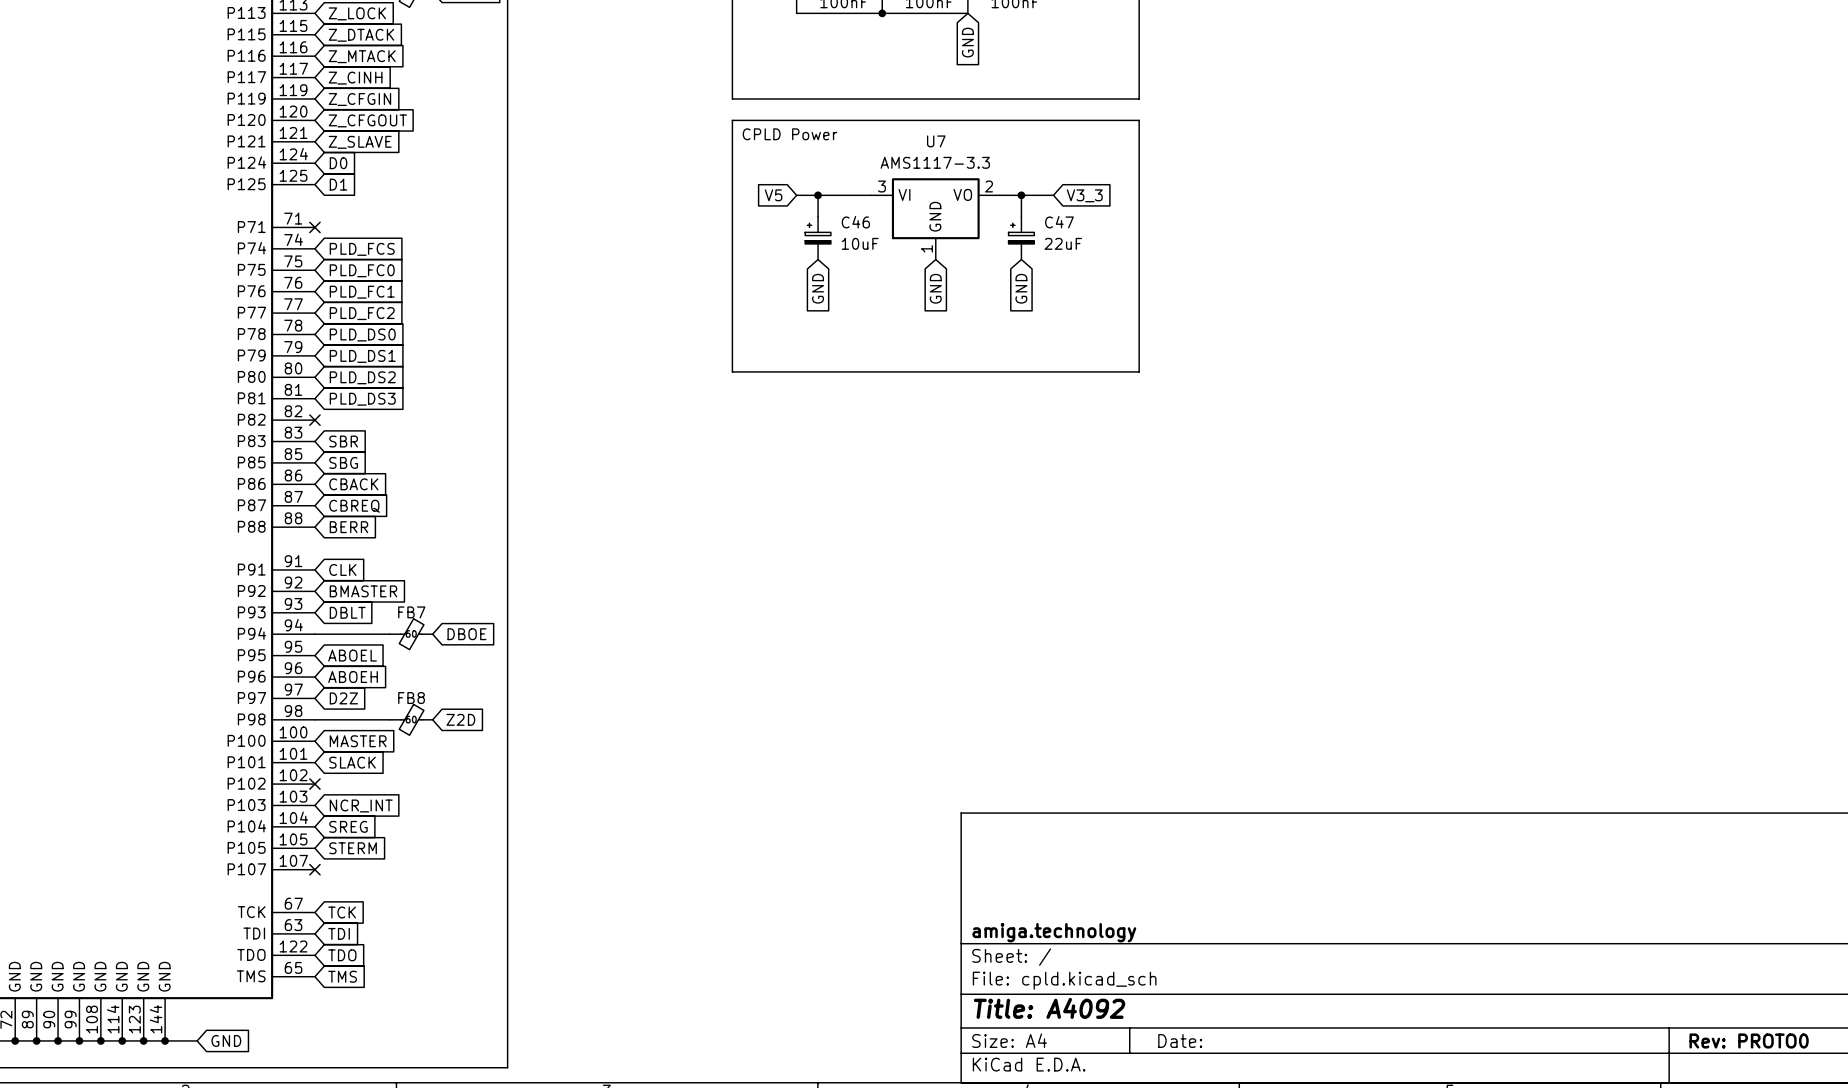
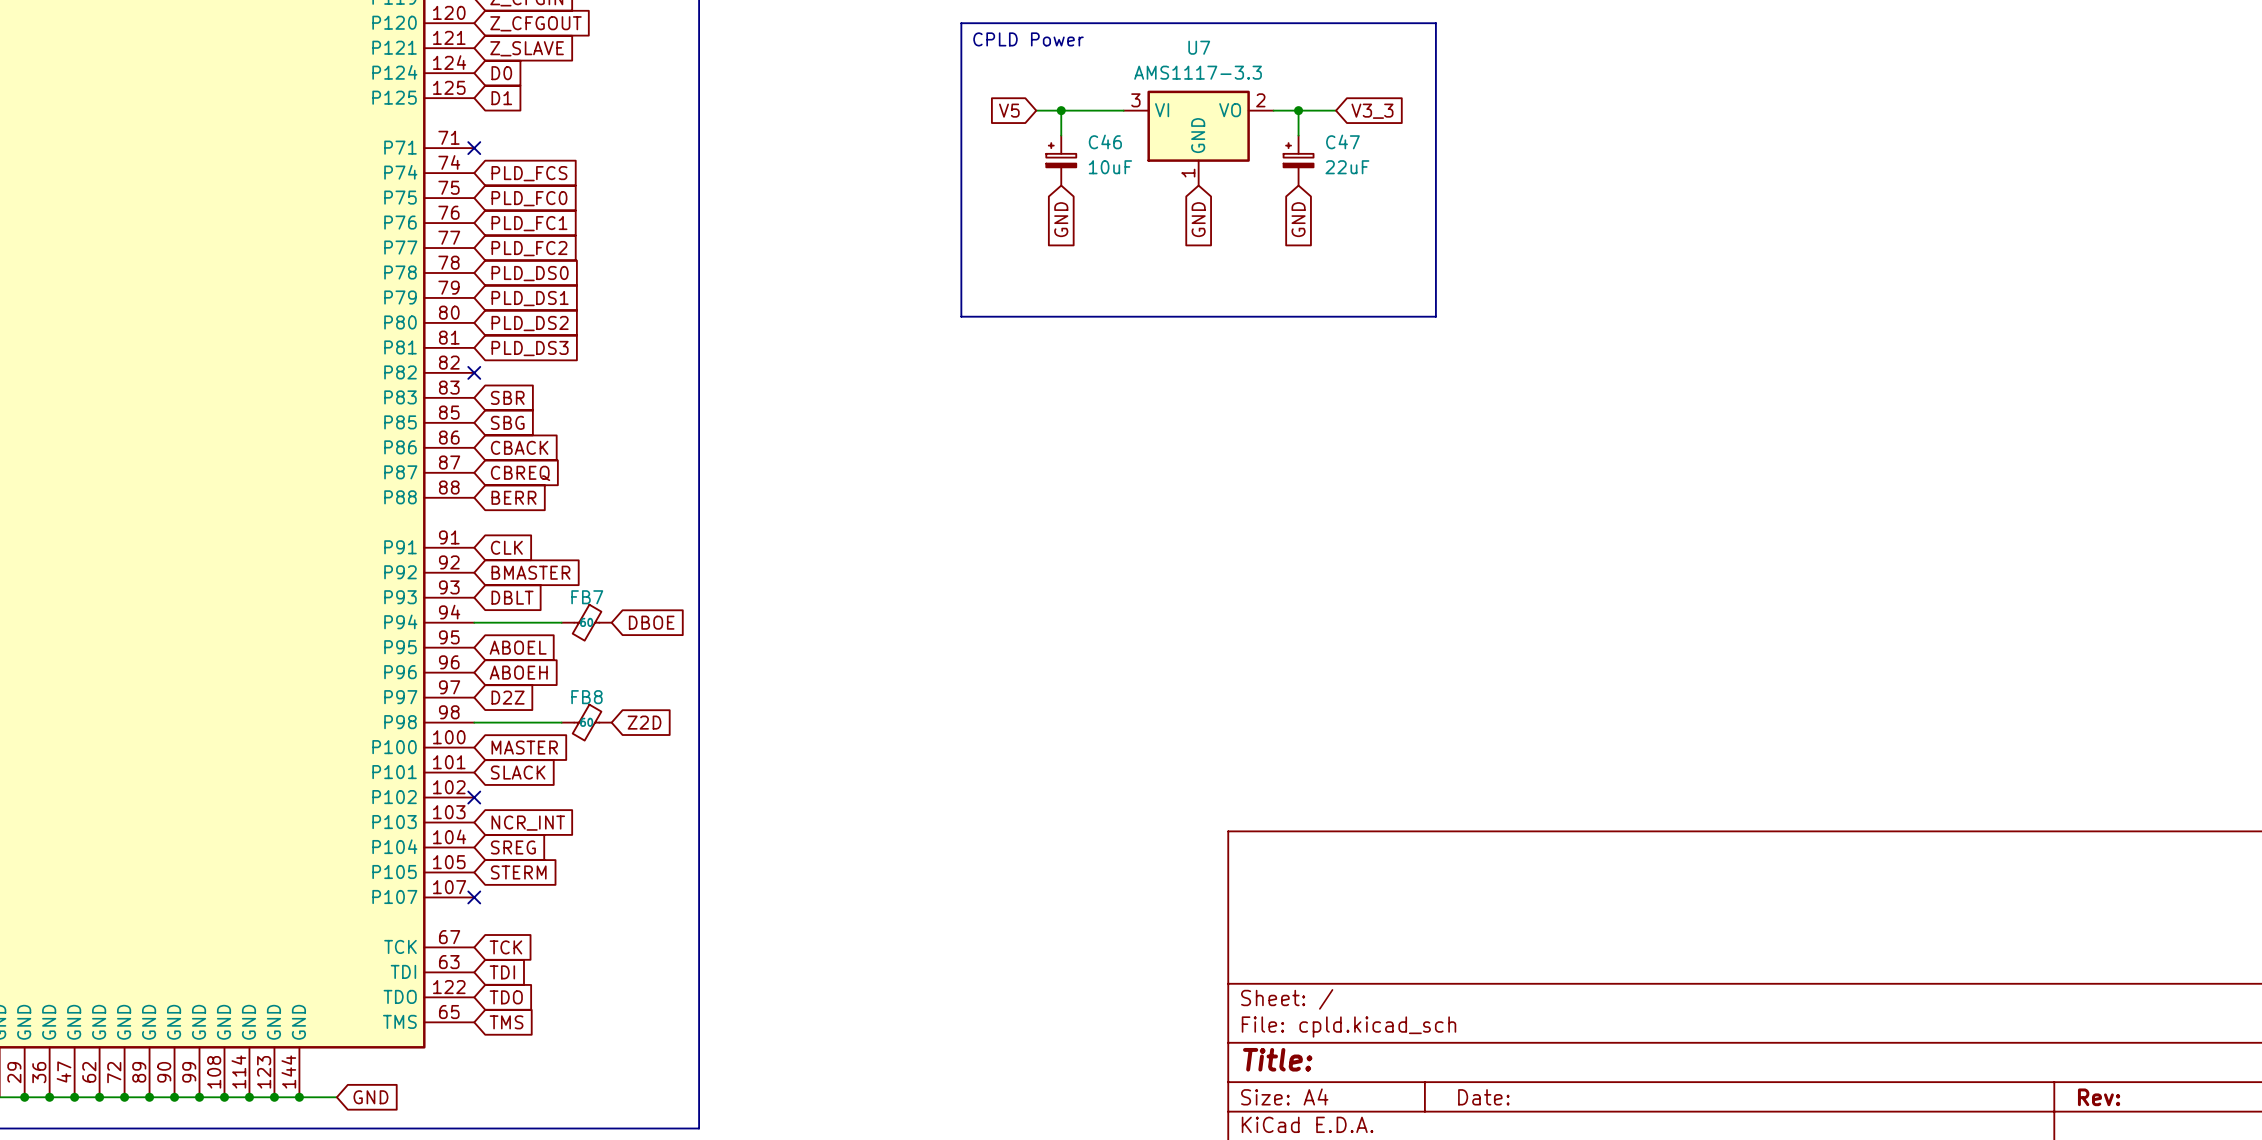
title block: amiga.technology (1054, 932) -> none
title block: Title: A4092 (1049, 1008) -> Title: (1277, 1059)
title block: Rev: PROTO0 (1749, 1040) -> Rev: (2099, 1097)

